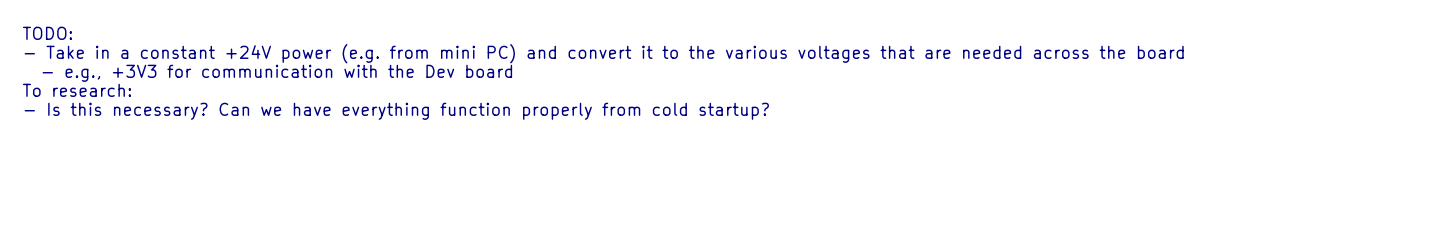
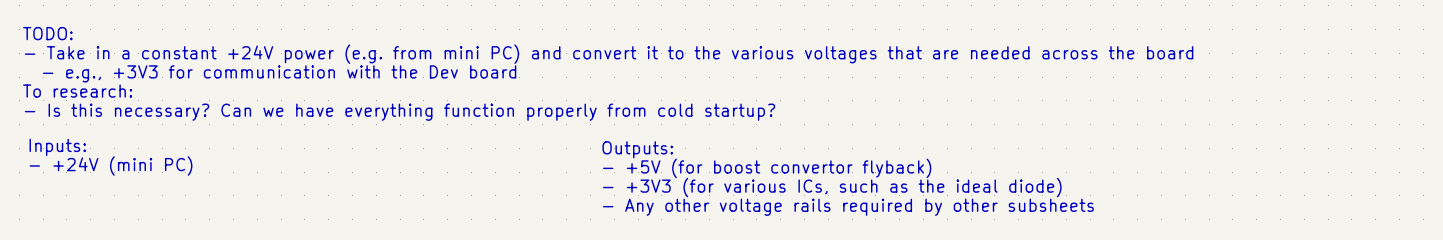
text: none -> Inputs: (57, 147)
text: none -> Outputs: (637, 149)
text: none -> - +24V (mini PC) (110, 166)
text: none -> - +5V (for boost convertor flyback) (767, 168)
text: none -> - +3V3 (for various ICs, such as the ideal diode) (832, 187)
text: none -> - Any other voltage rails required by other subsheets (848, 207)

